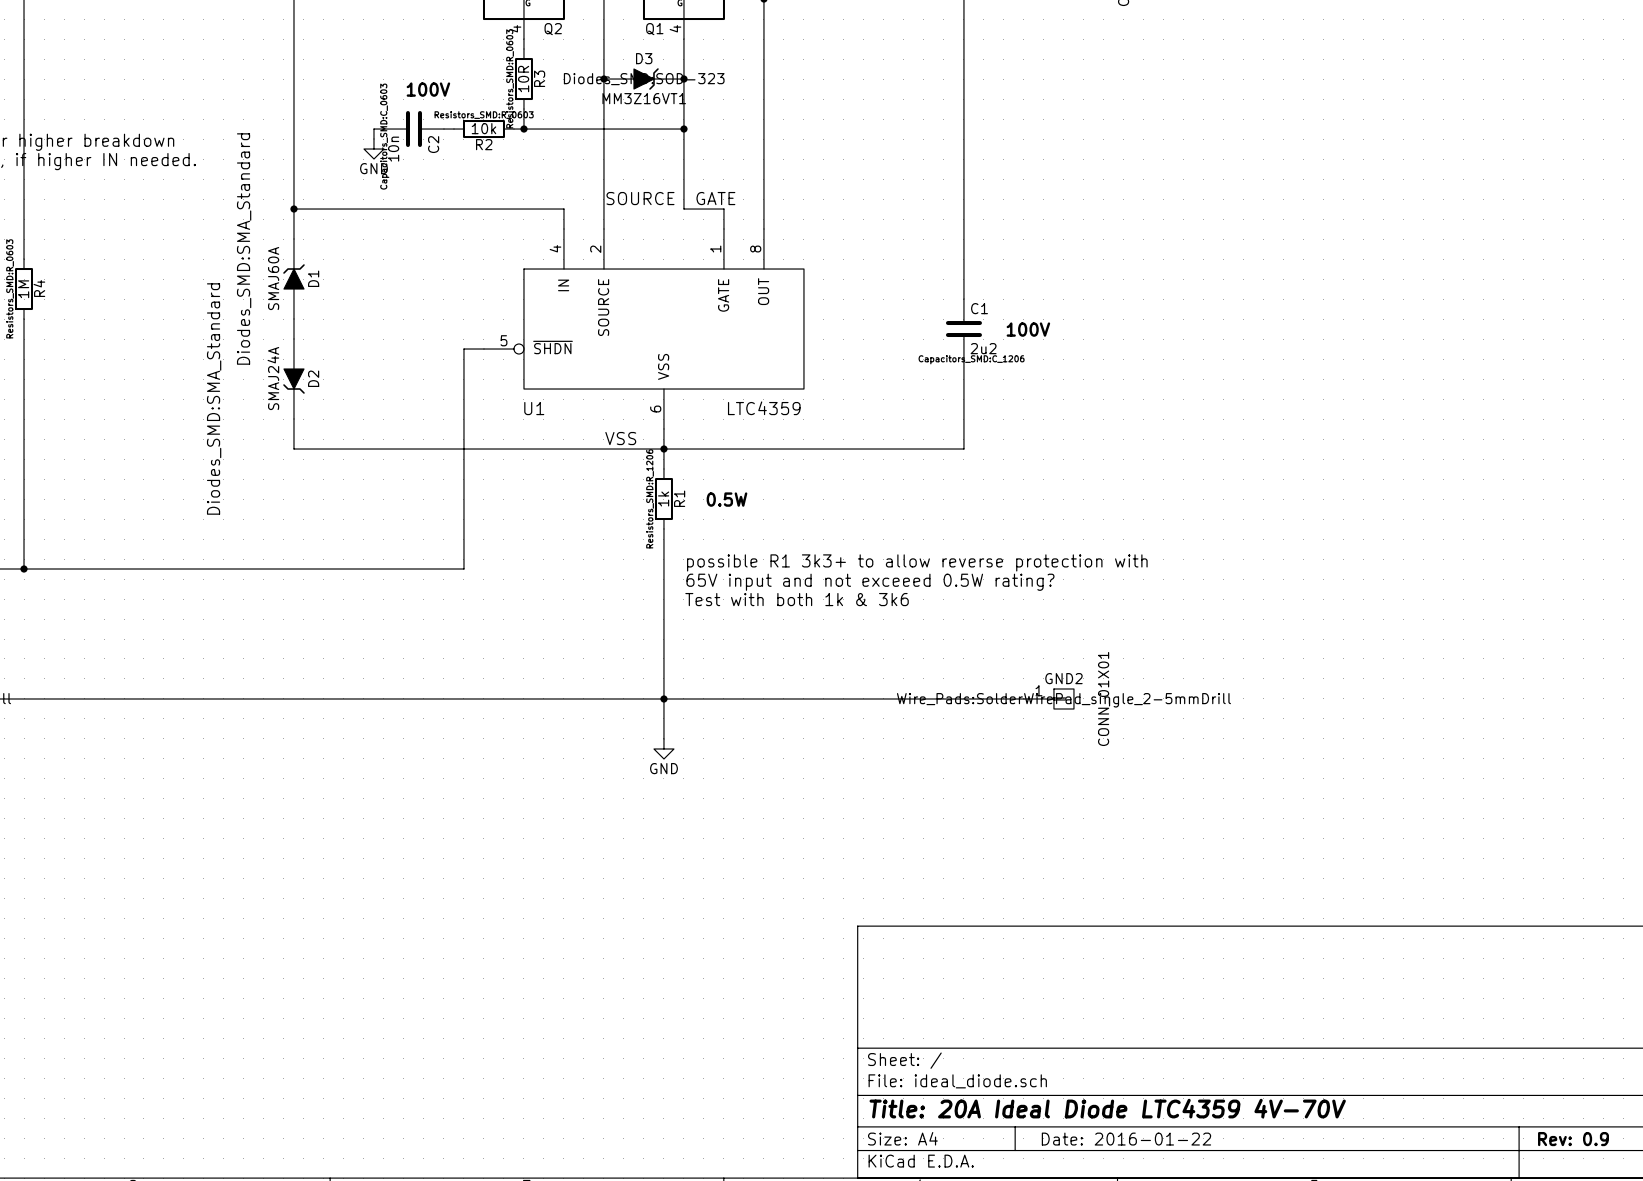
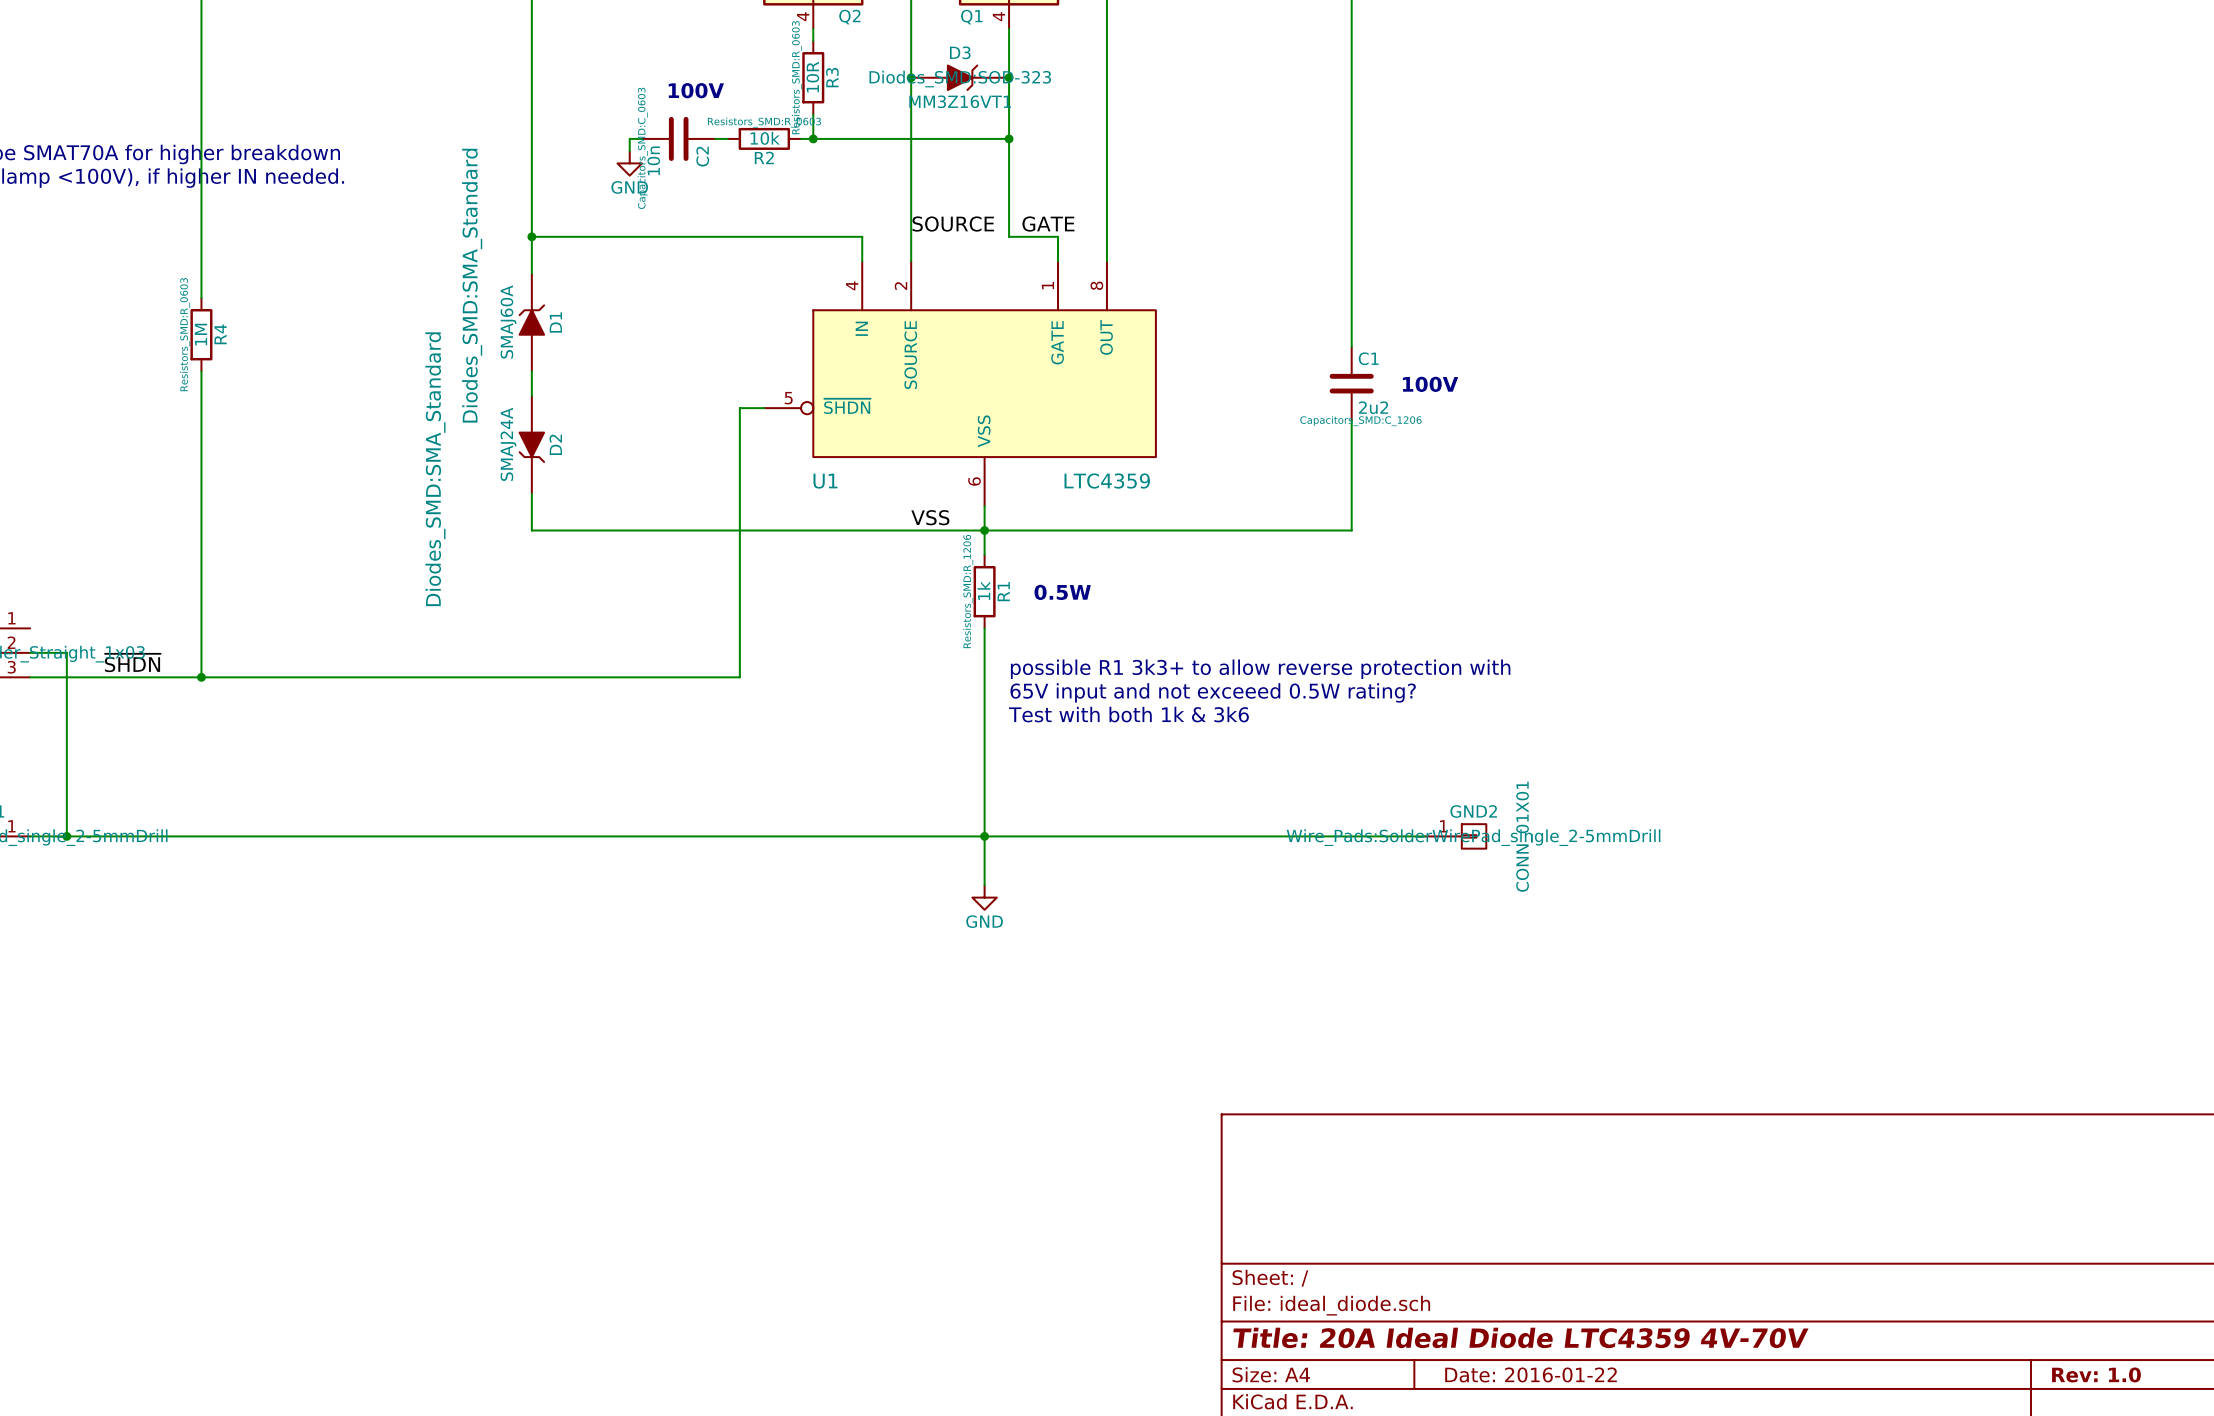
title block: Rev: 0.9 (1573, 1139) -> Rev: 1.0 (2096, 1374)

